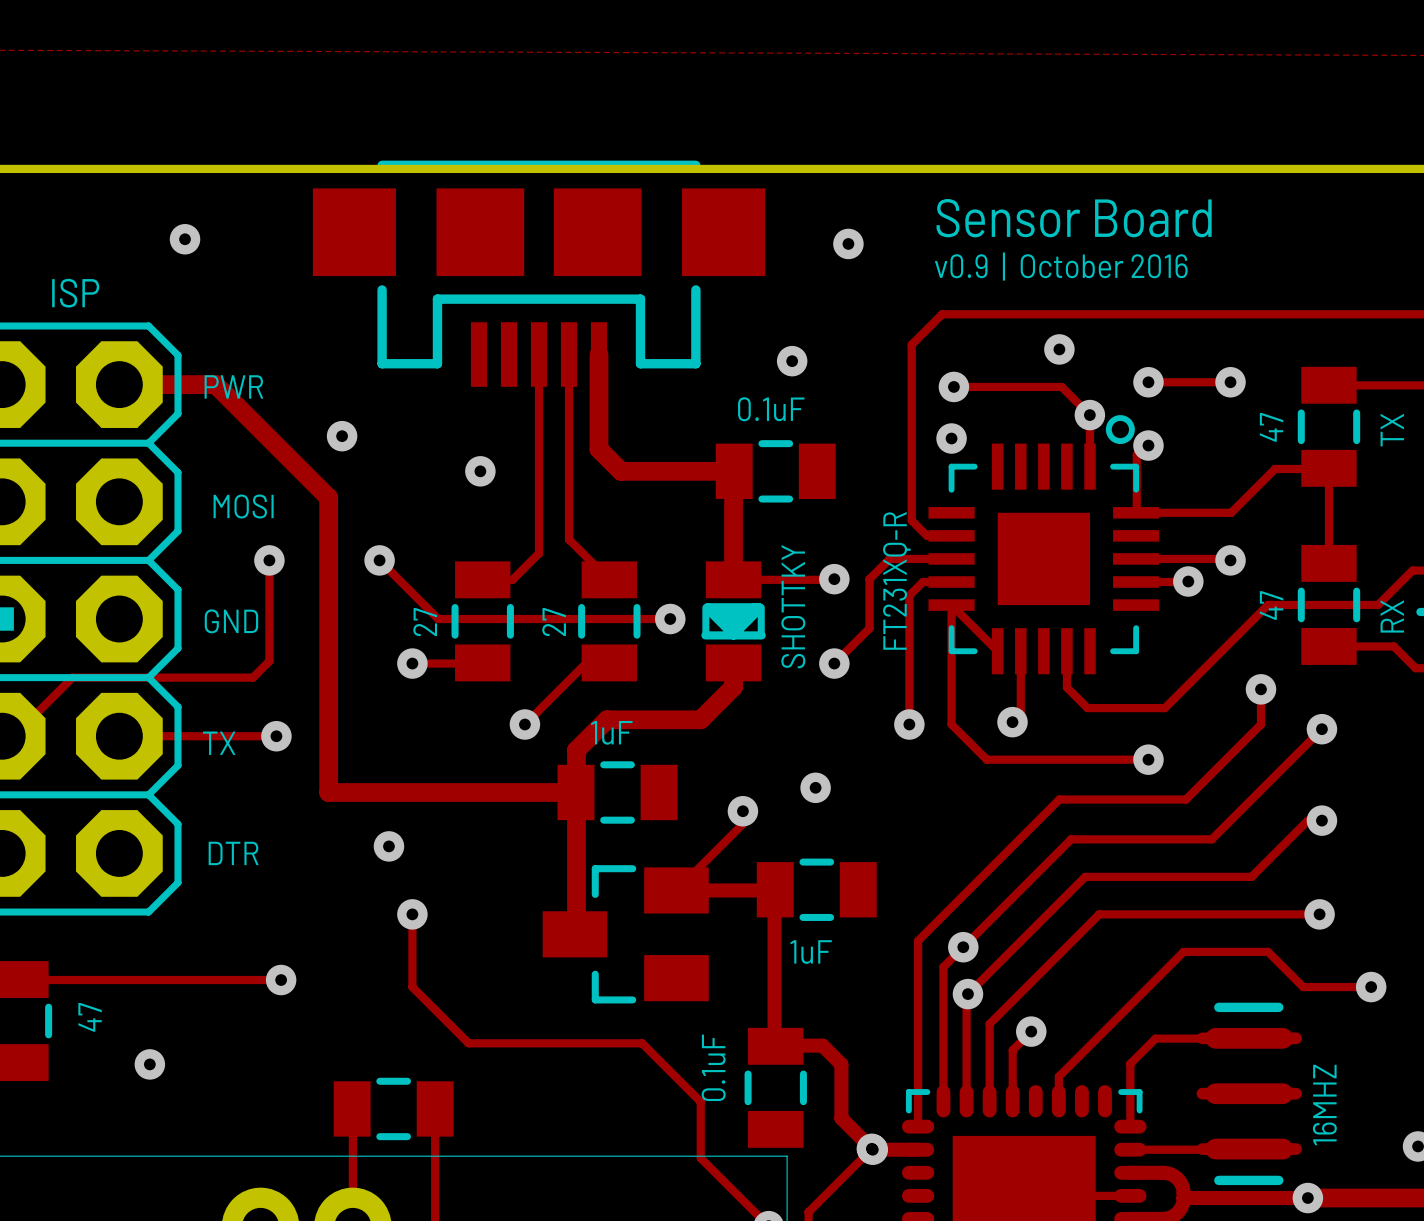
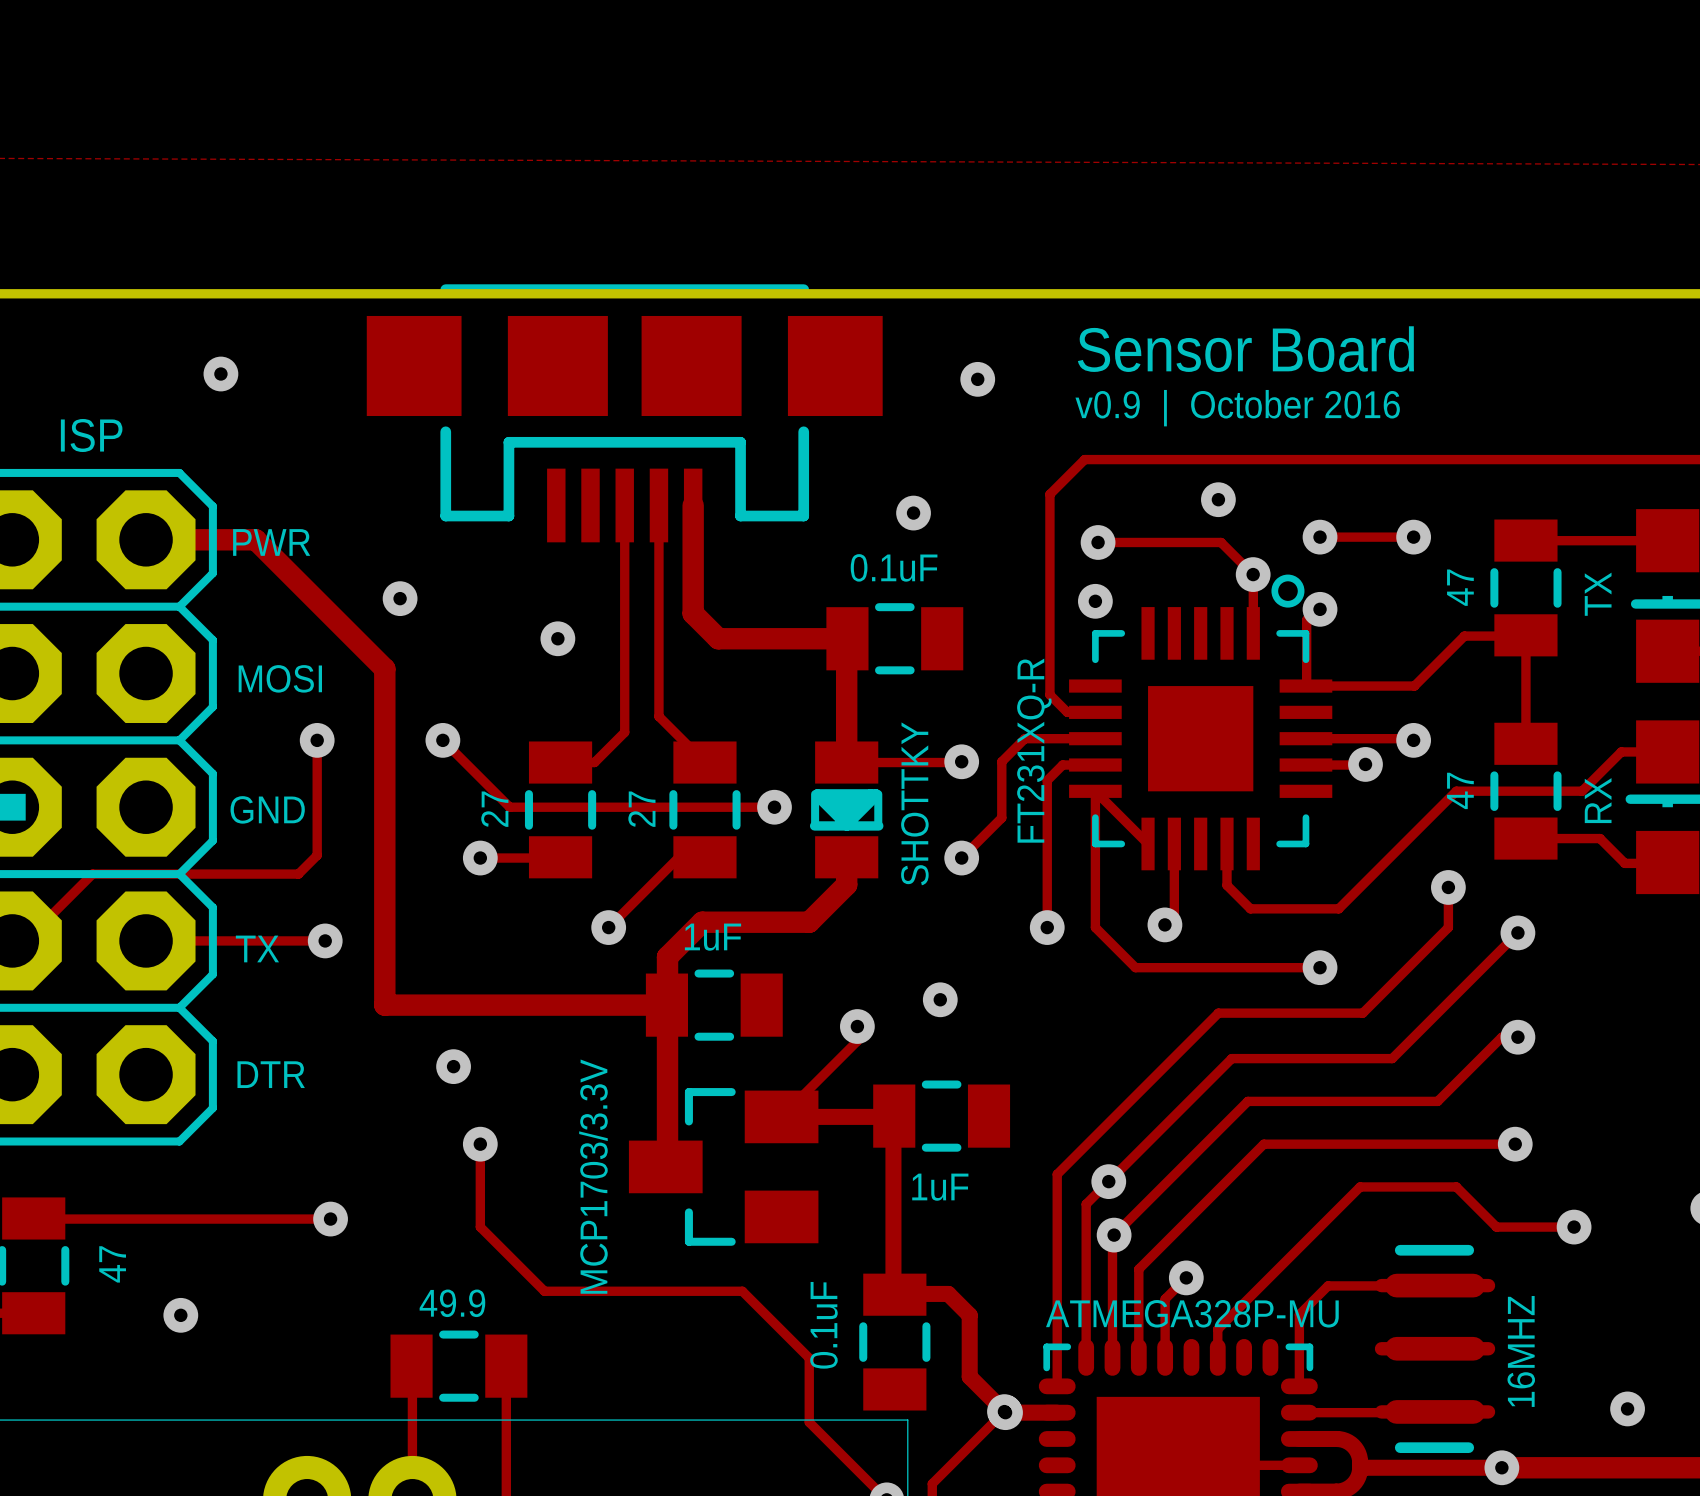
part value: none -> MCP1703/3.3V (593, 1176)
part value: none -> 49.9 (452, 1303)
part value: none -> ATMEGA328P-MU (1192, 1313)

